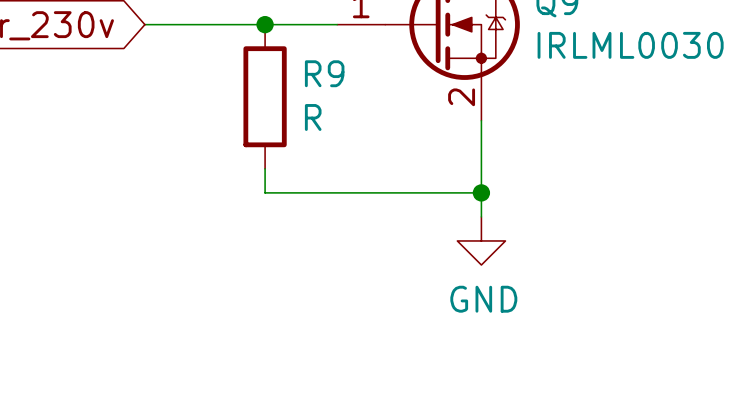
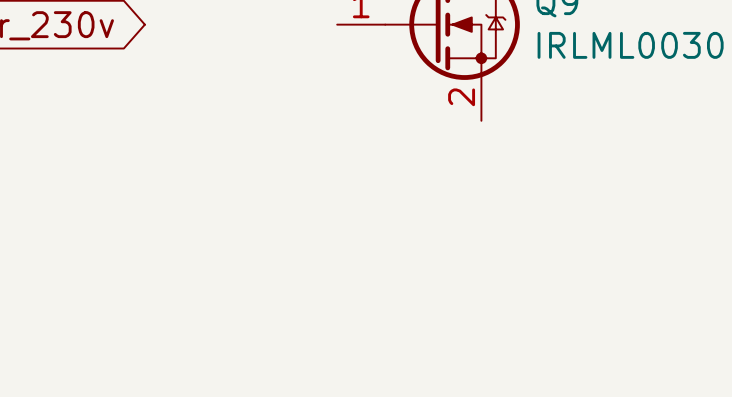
wire: (144, 24) (337, 24) -> none
junction: (265, 24) -> none
R9: R (265, 96) -> none
wire: (481, 120) (481, 216) -> none
wire: (265, 168) (265, 192) (481, 192) -> none
junction: (481, 192) -> none
power symbol: GND (481, 240) -> none

